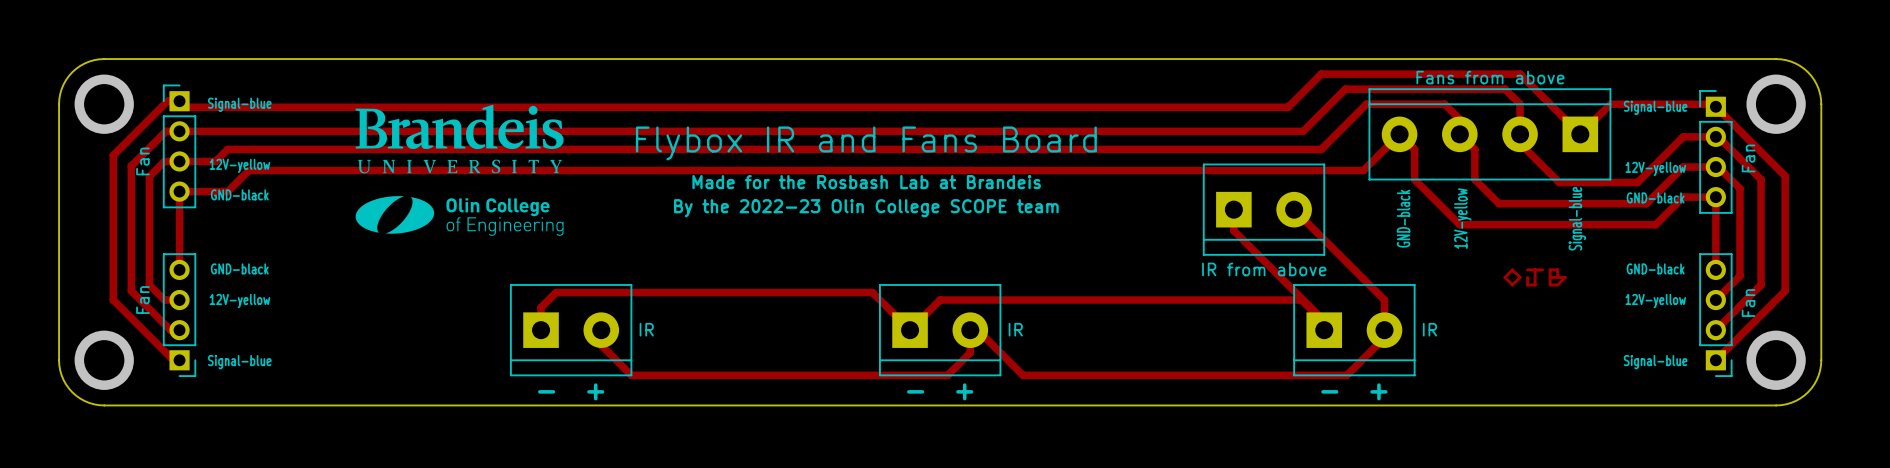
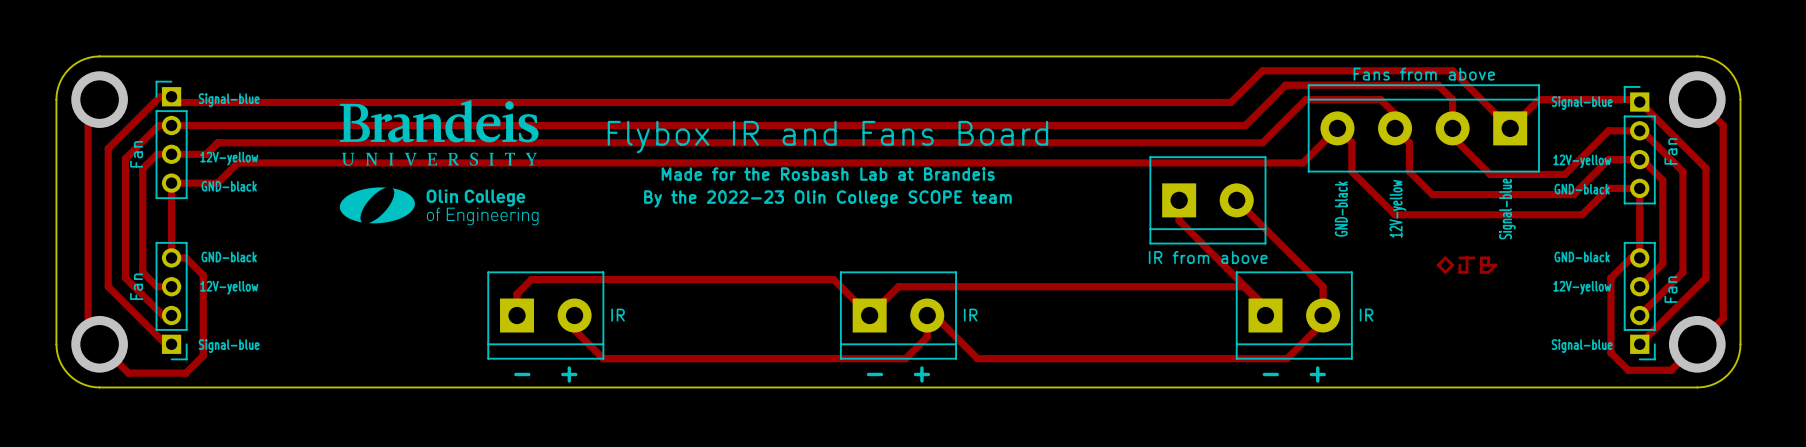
top track: none -> (99, 99) (88, 111) (88, 332) (128, 373) (185, 373) (203, 355) (203, 275) (185, 257) (171, 257)
top track: none -> (1697, 99) (1723, 125) (1723, 318) (1697, 344)
top track: none -> (1639, 257) (1631, 257) (1610, 278) (1610, 352) (1628, 370) (1671, 370) (1692, 349)

